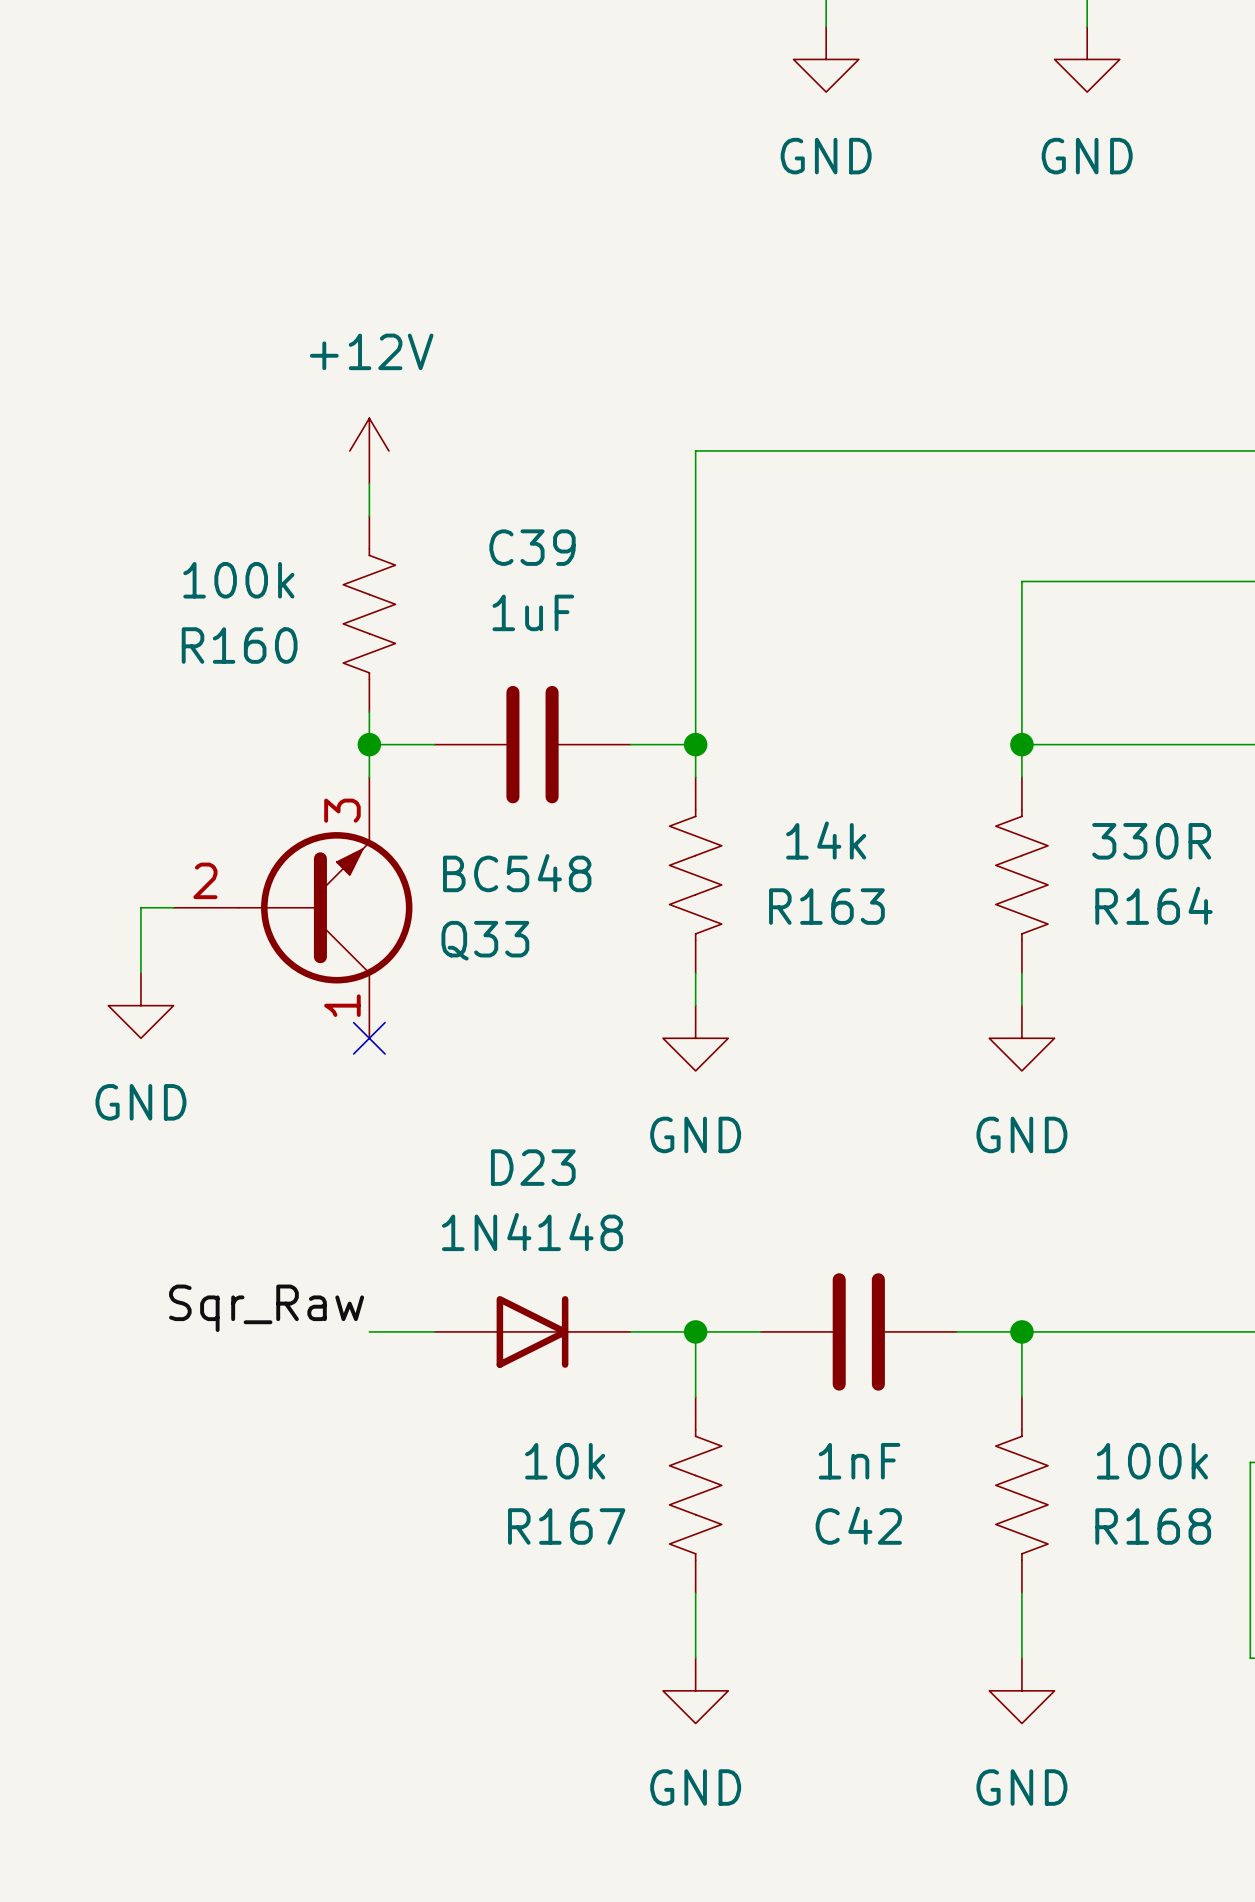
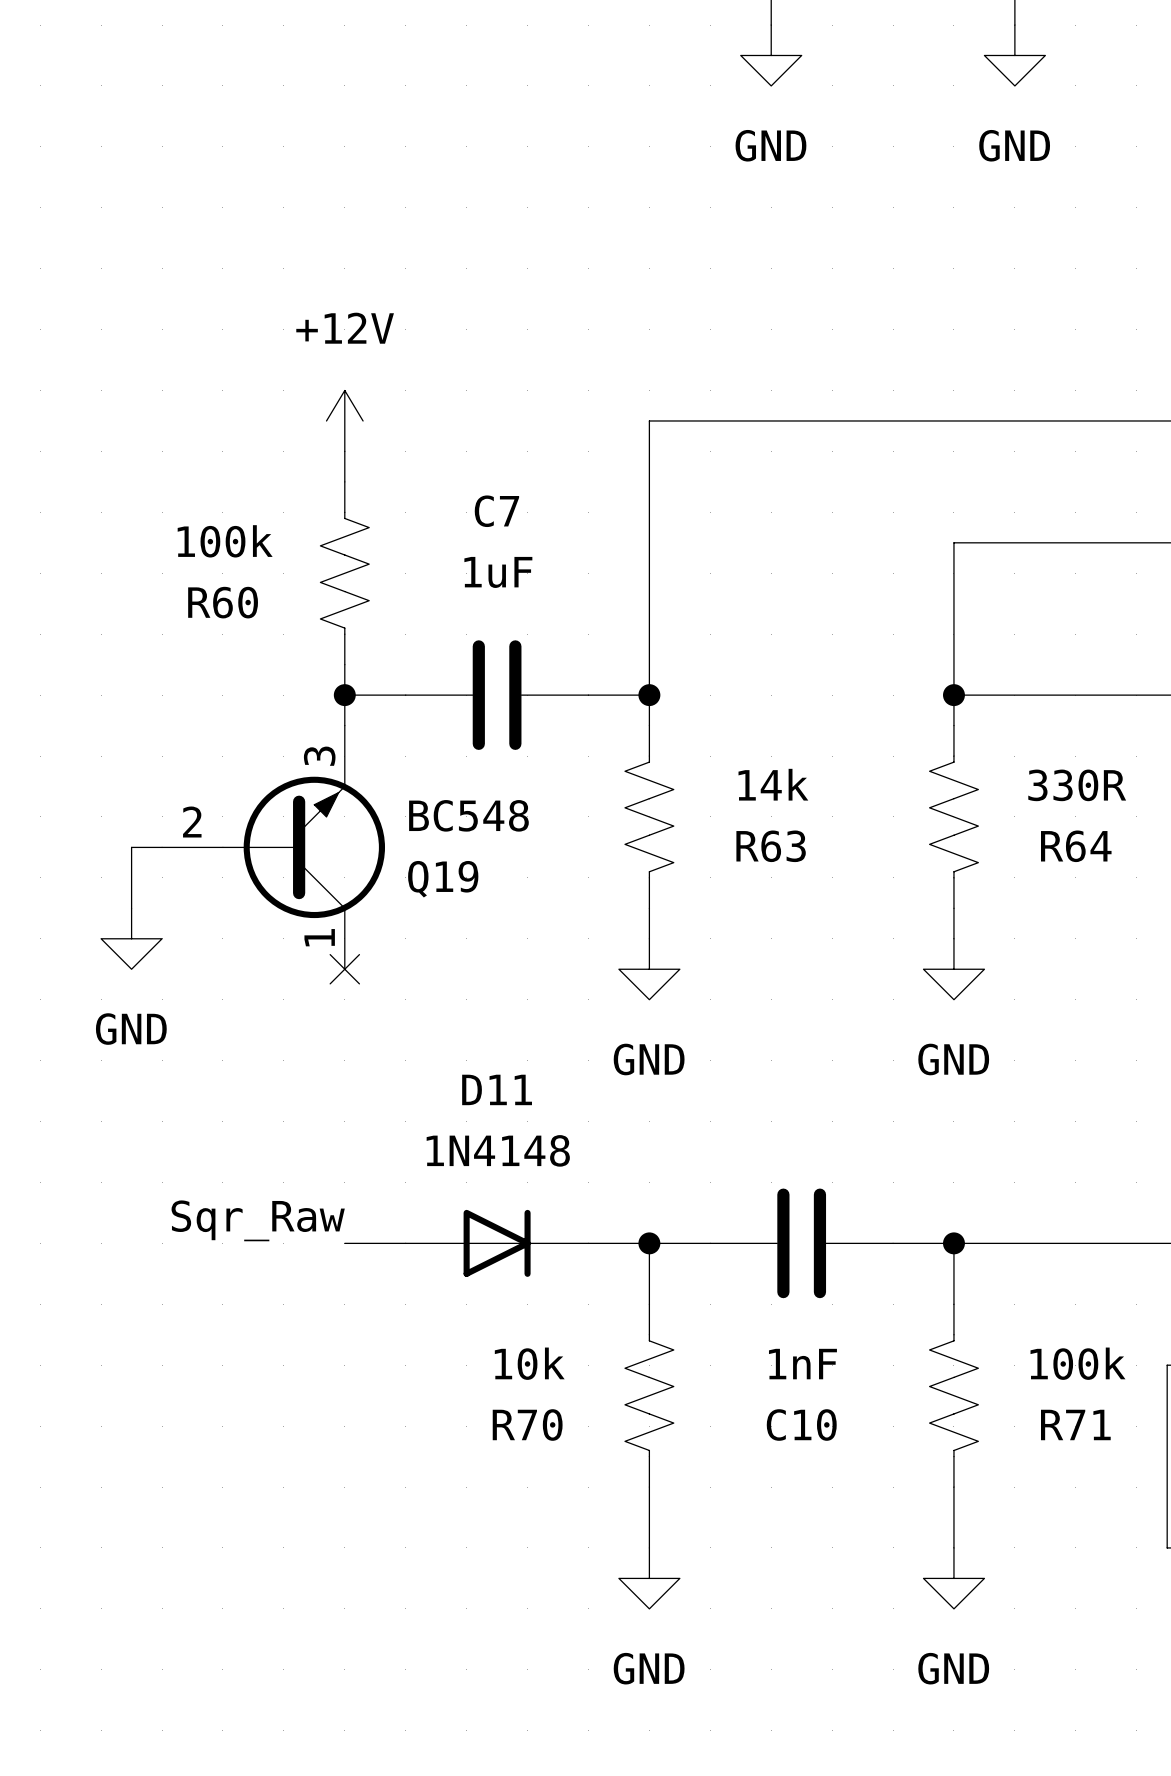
C39 name: C39 (532, 547) -> C7 (496, 511)
R160 name: R160 (239, 645) -> R60 (223, 602)
R164 name: R164 (1153, 905) -> R64 (1076, 846)
R163 name: R163 (826, 906) -> R63 (771, 846)
Q33 name: Q33 (485, 940) -> Q19 (443, 879)
D23 name: D23 (533, 1167) -> D11 (497, 1089)
C42 name: C42 (858, 1525) -> C10 (801, 1425)
R167 name: R167 (566, 1526) -> R70 (527, 1425)
R168 name: R168 (1153, 1526) -> R71 (1075, 1424)

